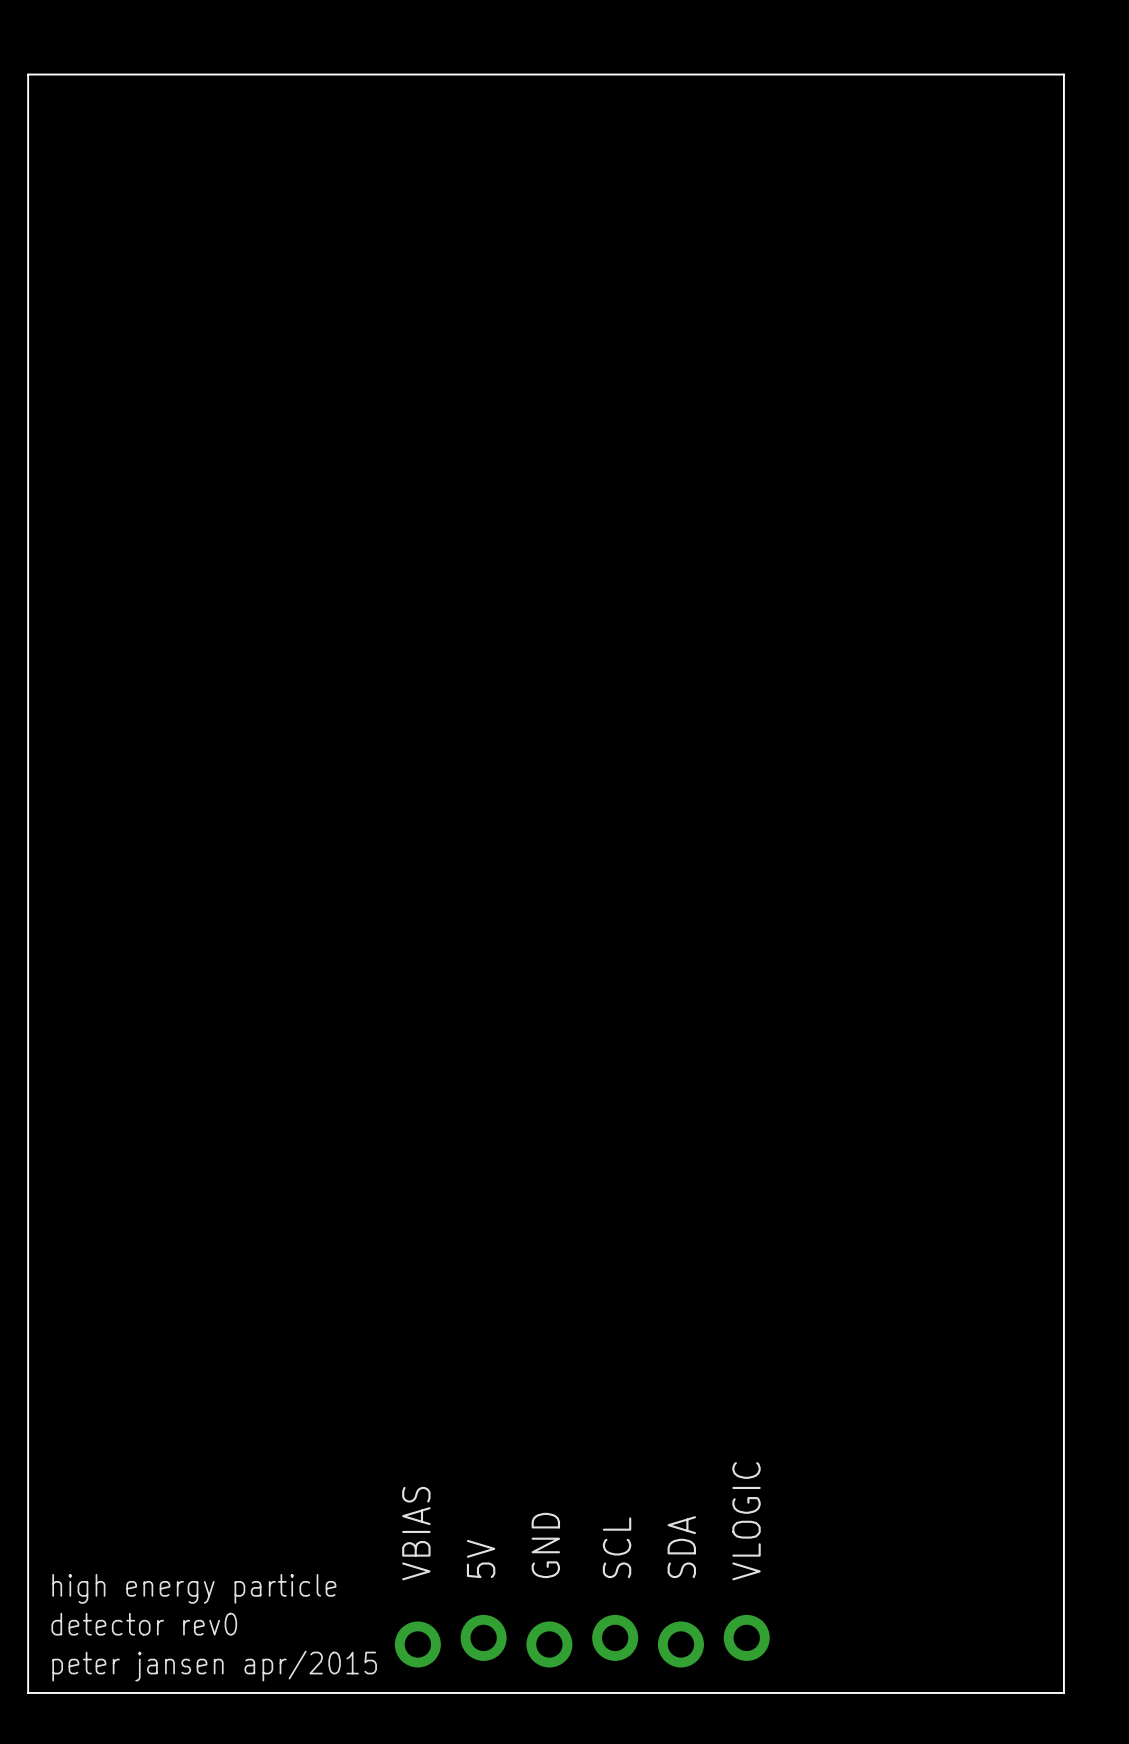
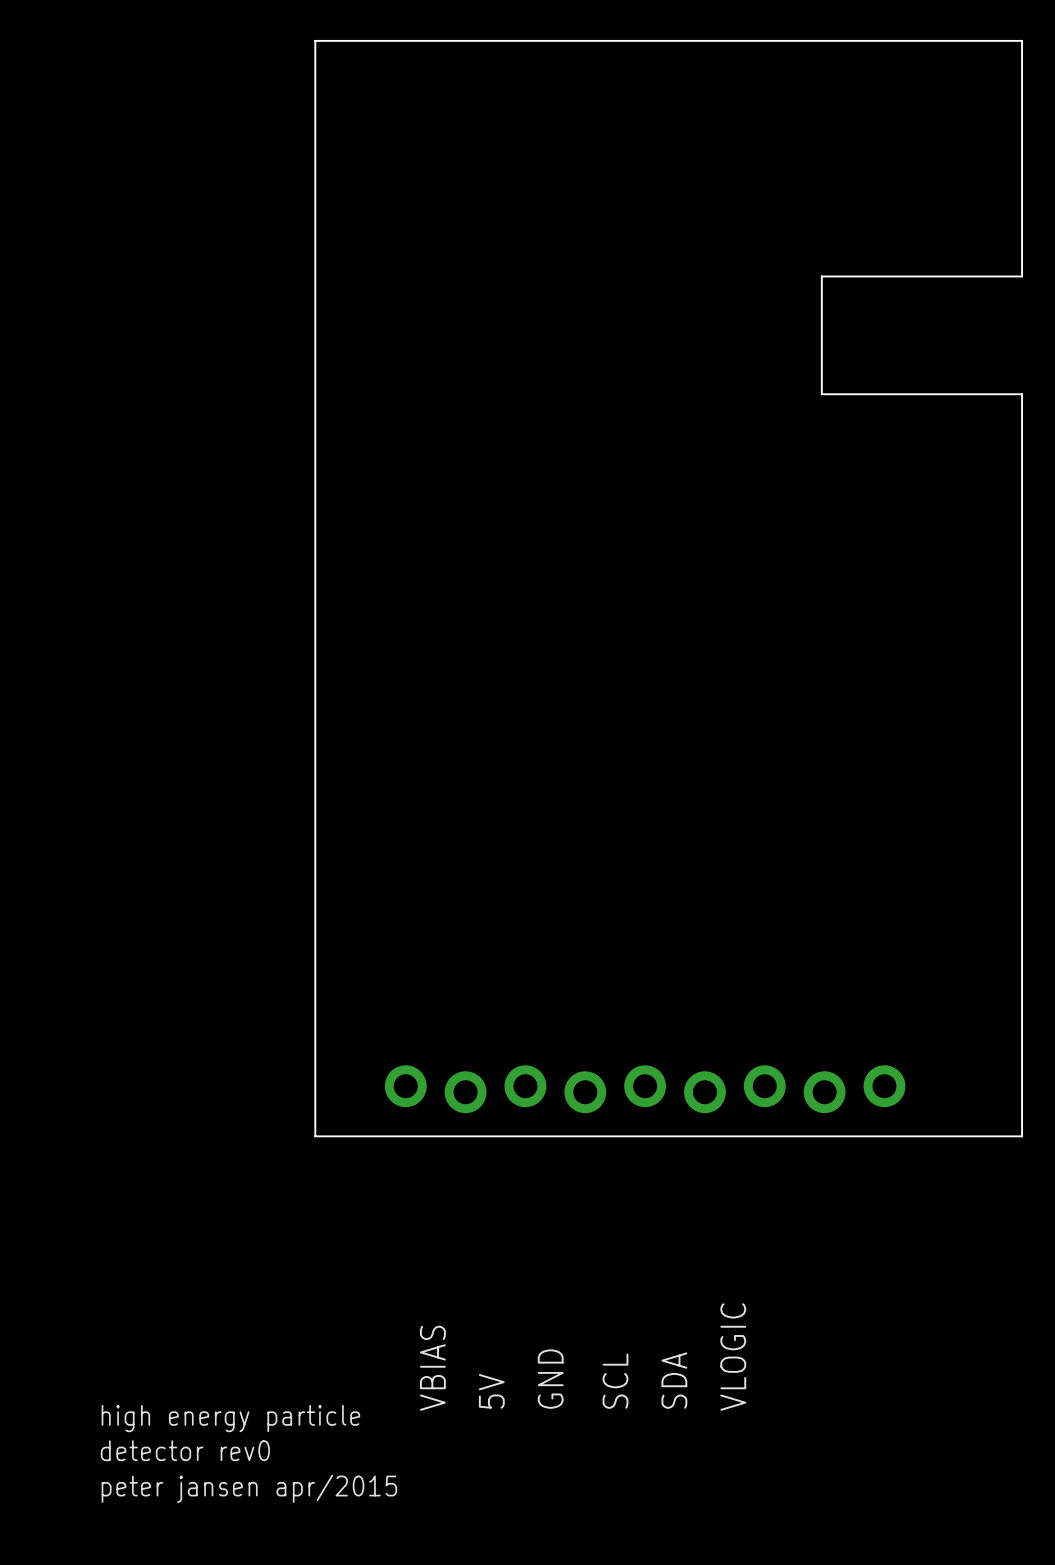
board edge: (287, 74) (28, 74) (28, 1692) (1063, 1692) (1063, 1278) -> (315, 40) (315, 1136) (1022, 1136)
board edge: (1063, 333) (1063, 462) -> (1022, 276) (821, 276) (821, 394) (1022, 394)
part: none -> (645, 1089)
part: (582, 1641) -> none

